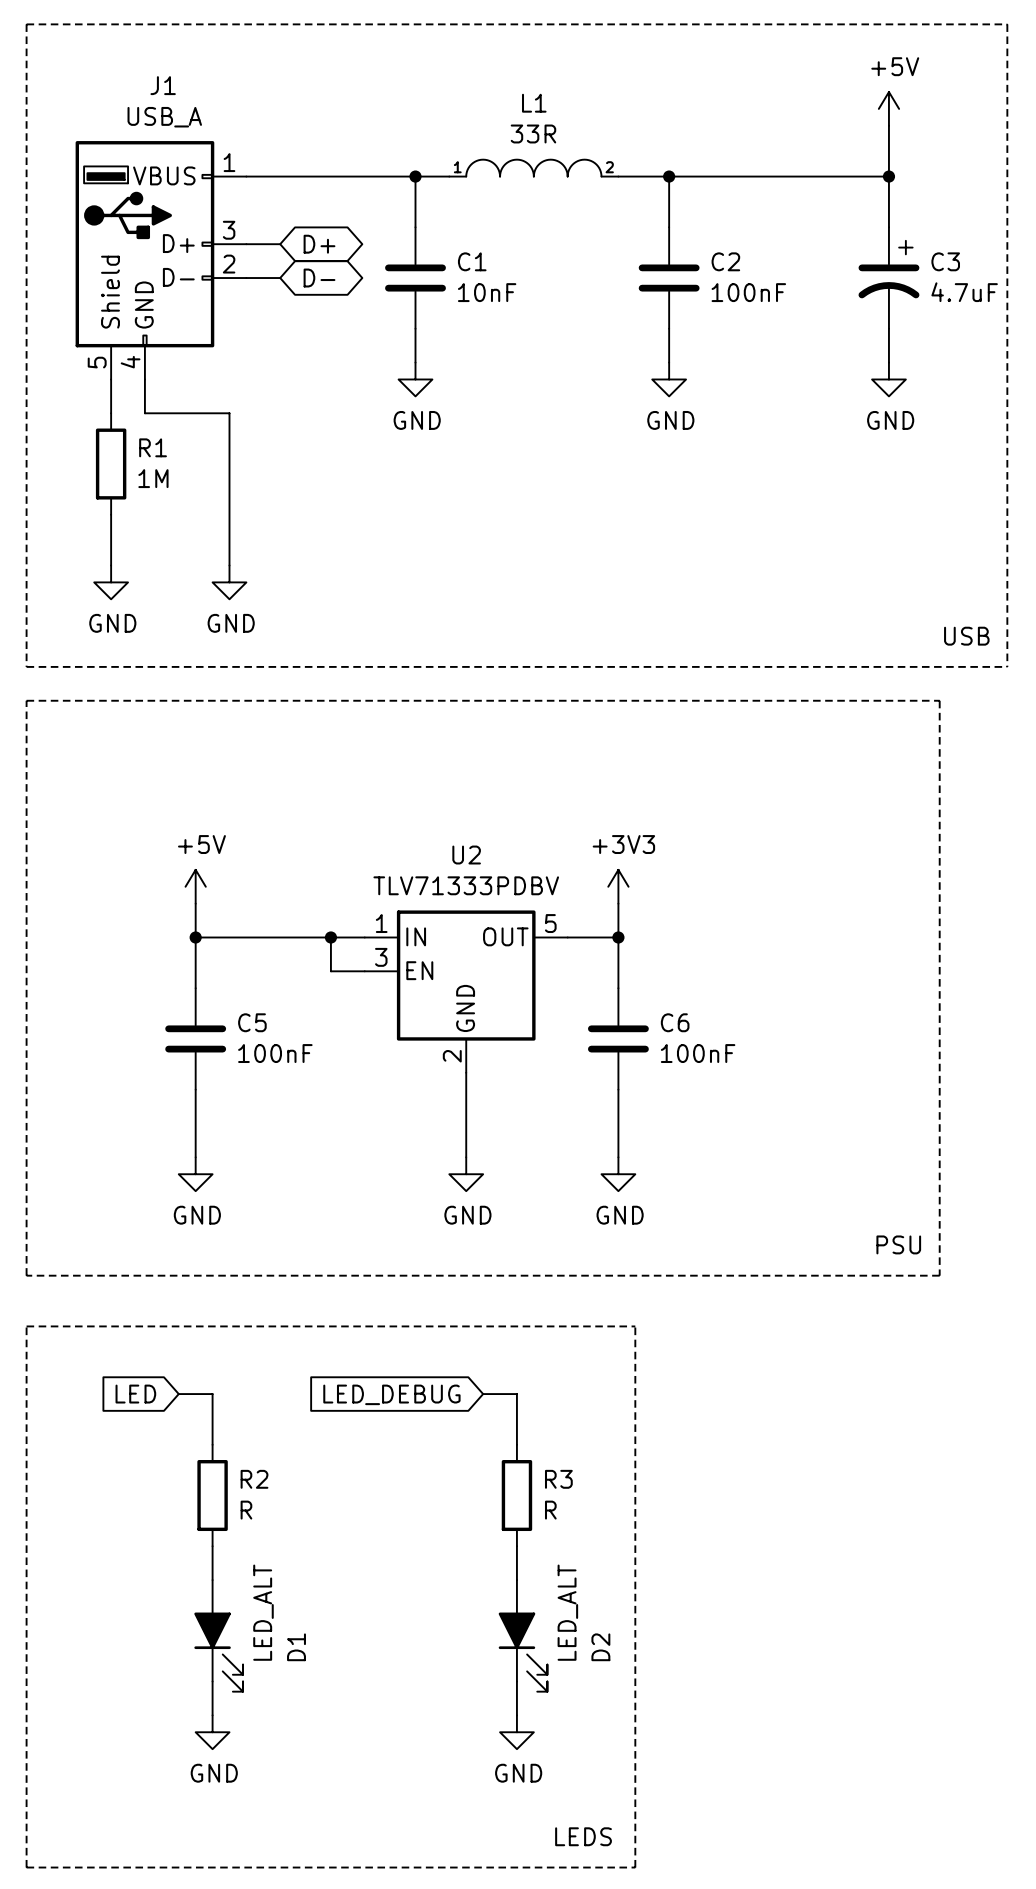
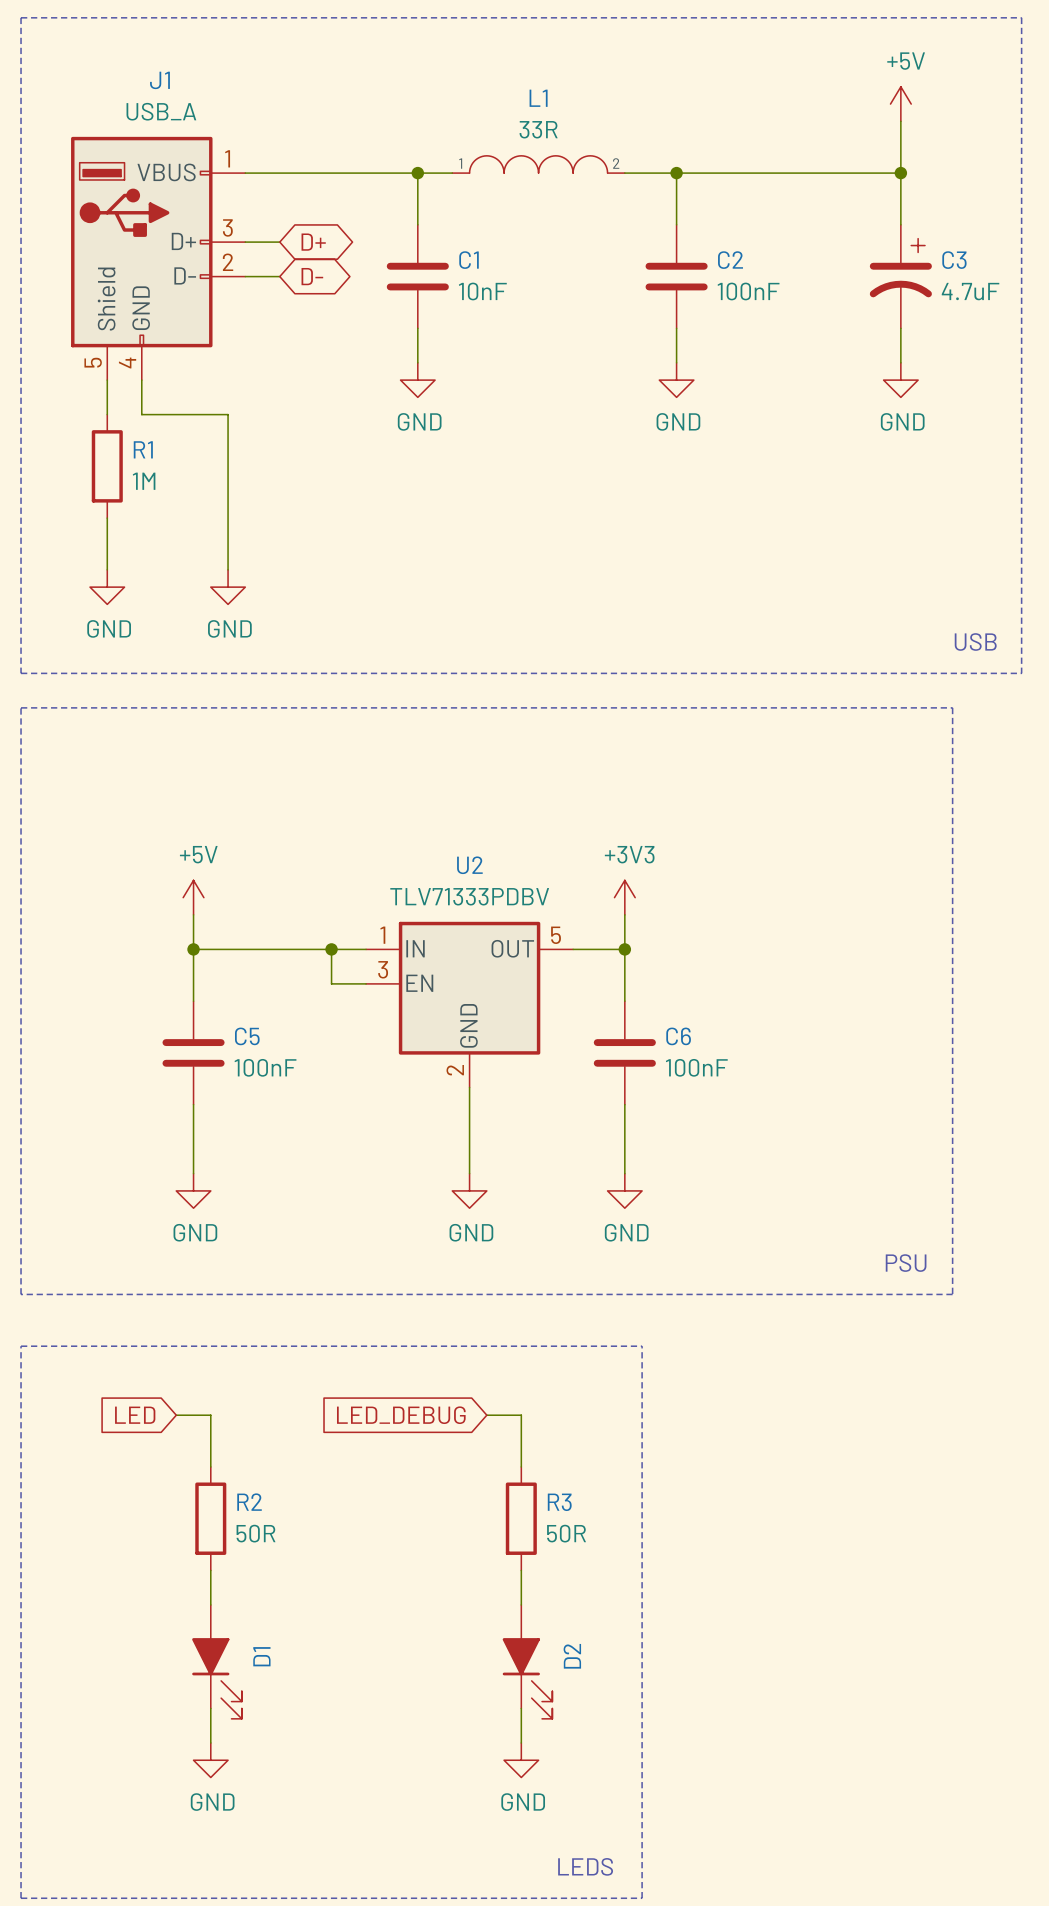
R2 value: R (246, 1510) -> 50R (255, 1533)
R3 value: R (550, 1510) -> 50R (566, 1533)
D1 value: LED_ALT (263, 1612) -> none
D2 value: LED_ALT (567, 1612) -> none
D1 name position: D1 (296, 1647) -> D1 (261, 1656)
D2 name position: D2 (600, 1647) -> D2 (572, 1656)

